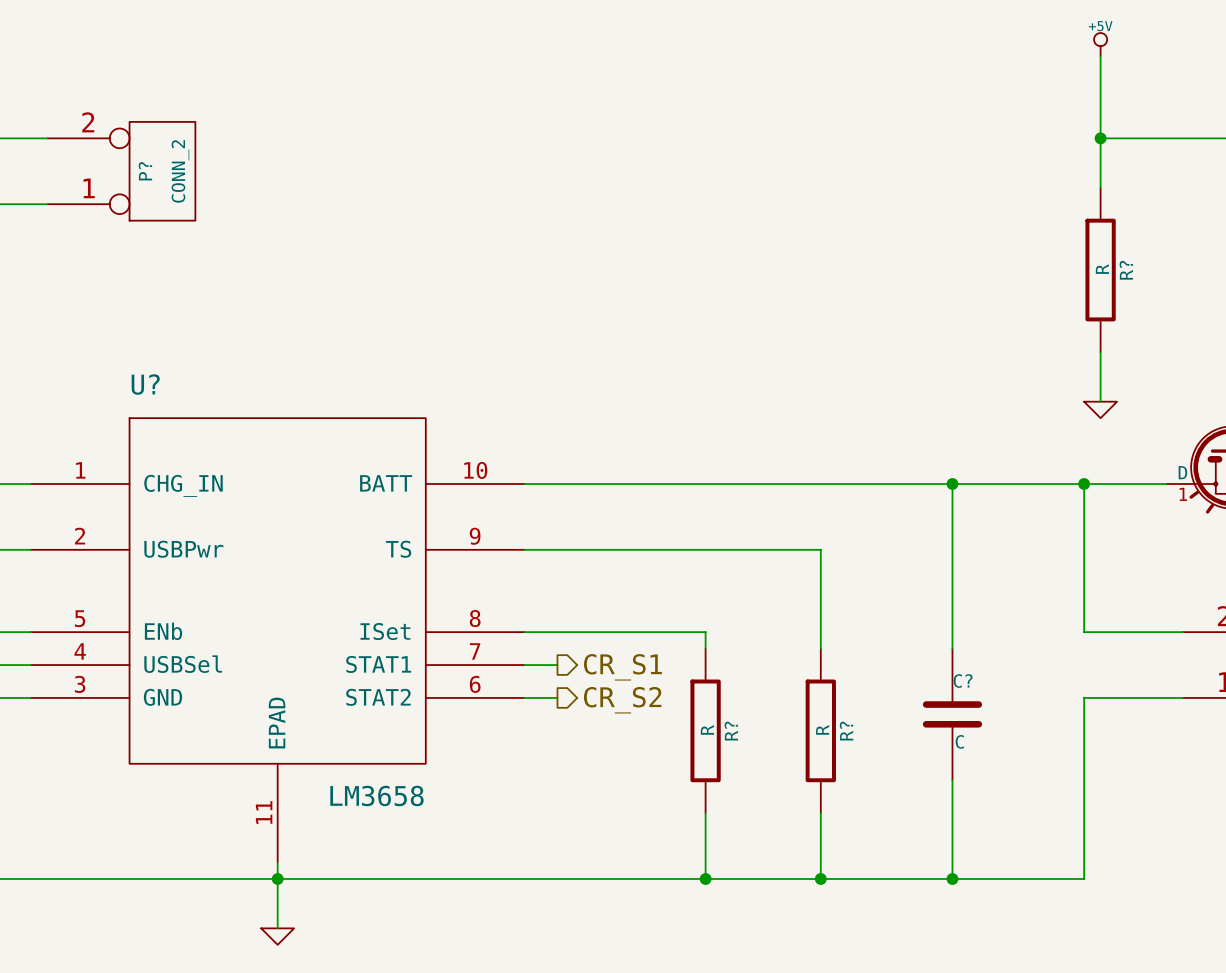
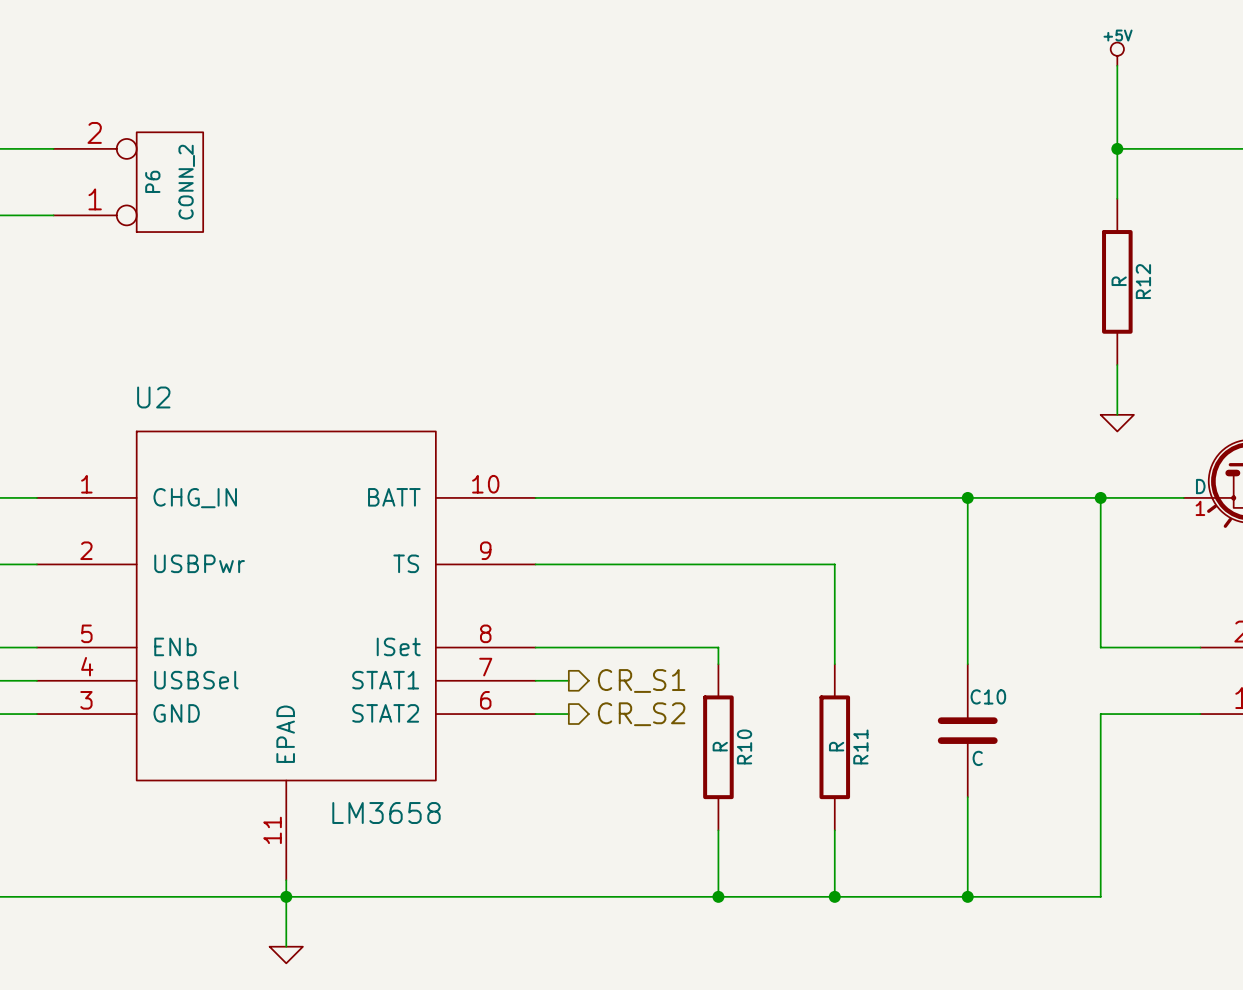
P? name: P? (145, 171) -> P6 (152, 181)
R? name: R? (1126, 270) -> R12 (1143, 281)
U? name: U? (145, 384) -> U2 (153, 397)
C? name: C? (963, 681) -> C10 (988, 696)
R? name: R? (731, 731) -> R10 (744, 746)
R? name: R? (846, 731) -> R11 (860, 746)

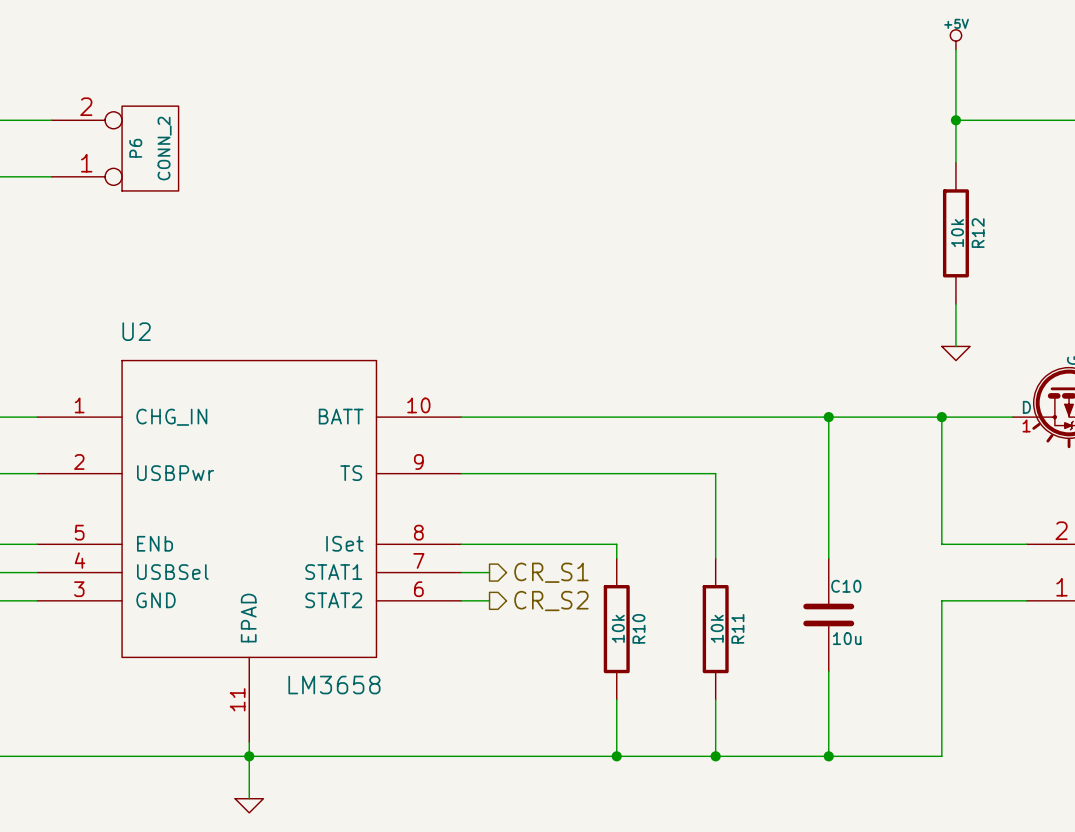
R12 value: R (1119, 281) -> 10k (957, 233)
R10 value: R (720, 746) -> 10k (618, 628)
R11 value: R (836, 746) -> 10k (717, 628)
C10 value: C (977, 758) -> 10u (847, 638)

